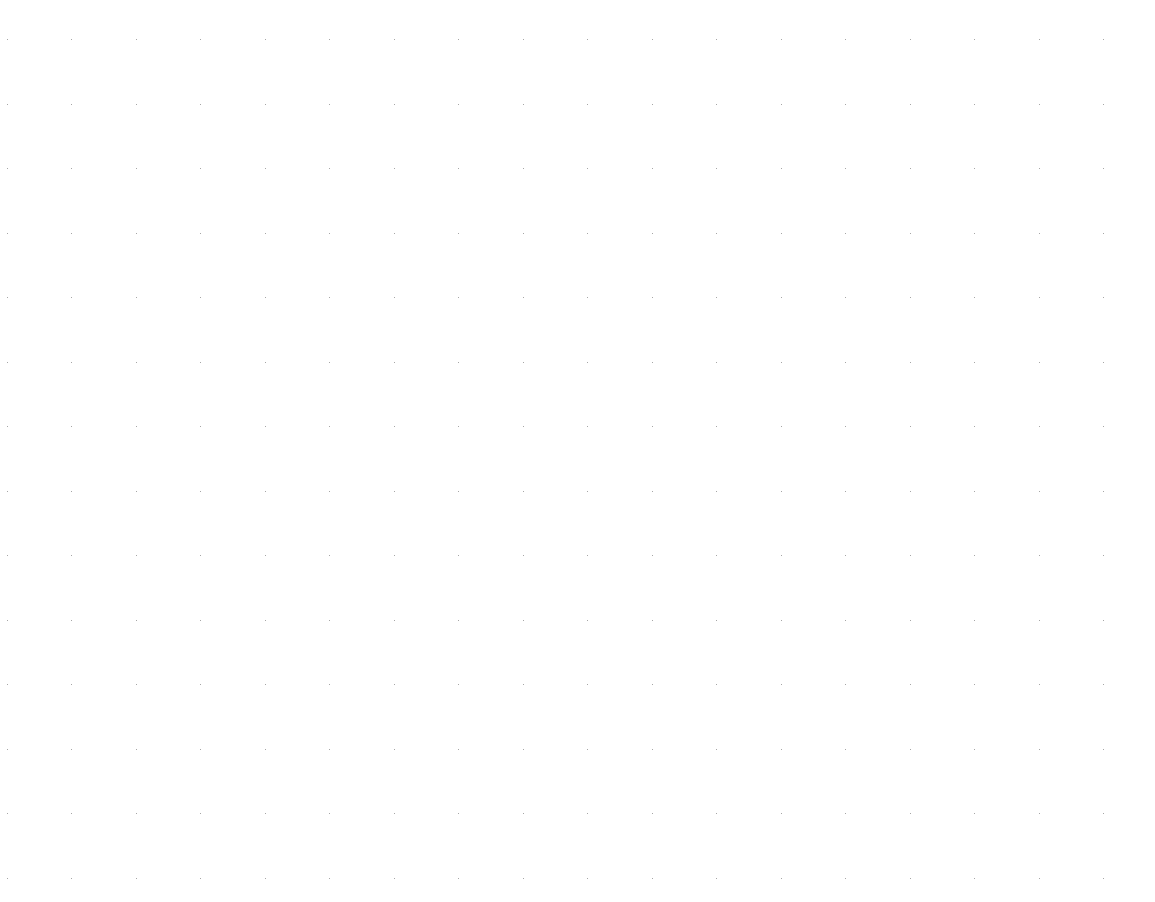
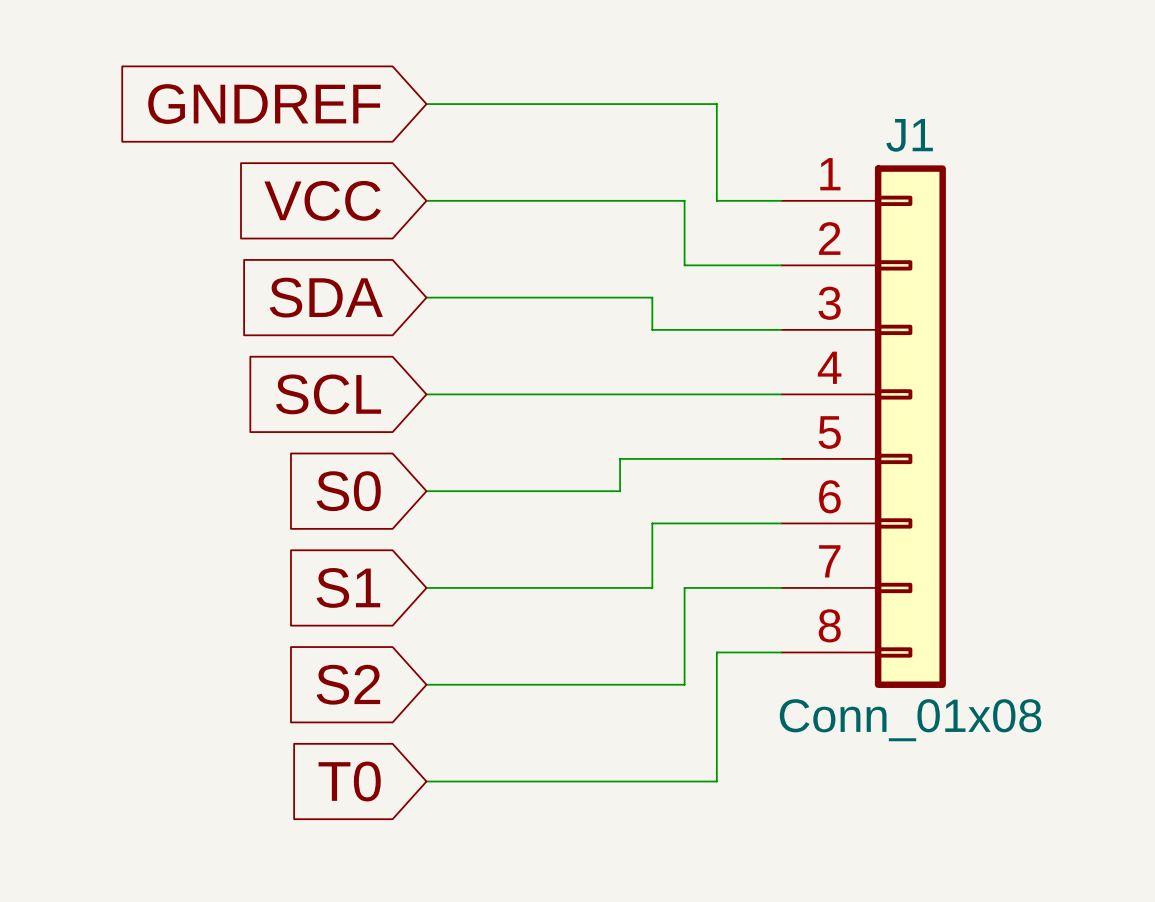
global label: none -> GNDREF (264, 104)
wire: none -> (426, 104) (716, 104) (716, 200) (781, 200)
global label: none -> VCC (322, 200)
wire: none -> (426, 200) (684, 200) (684, 265) (781, 265)
global label: none -> SDA (326, 297)
wire: none -> (426, 297) (652, 297) (652, 329) (781, 329)
global label: none -> SCL (328, 394)
wire: none -> (426, 394) (781, 394)
J1: none -> Conn_01x08 (863, 426)
wire: none -> (781, 458) (620, 458) (620, 491) (426, 491)
global label: none -> S0 (348, 491)
wire: none -> (781, 523) (652, 523) (652, 587) (426, 587)
global label: none -> S1 (348, 587)
wire: none -> (781, 587) (684, 587) (684, 684) (426, 684)
wire: none -> (781, 652) (716, 652) (716, 781) (426, 781)
global label: none -> S2 (348, 684)
global label: none -> T0 (349, 781)

